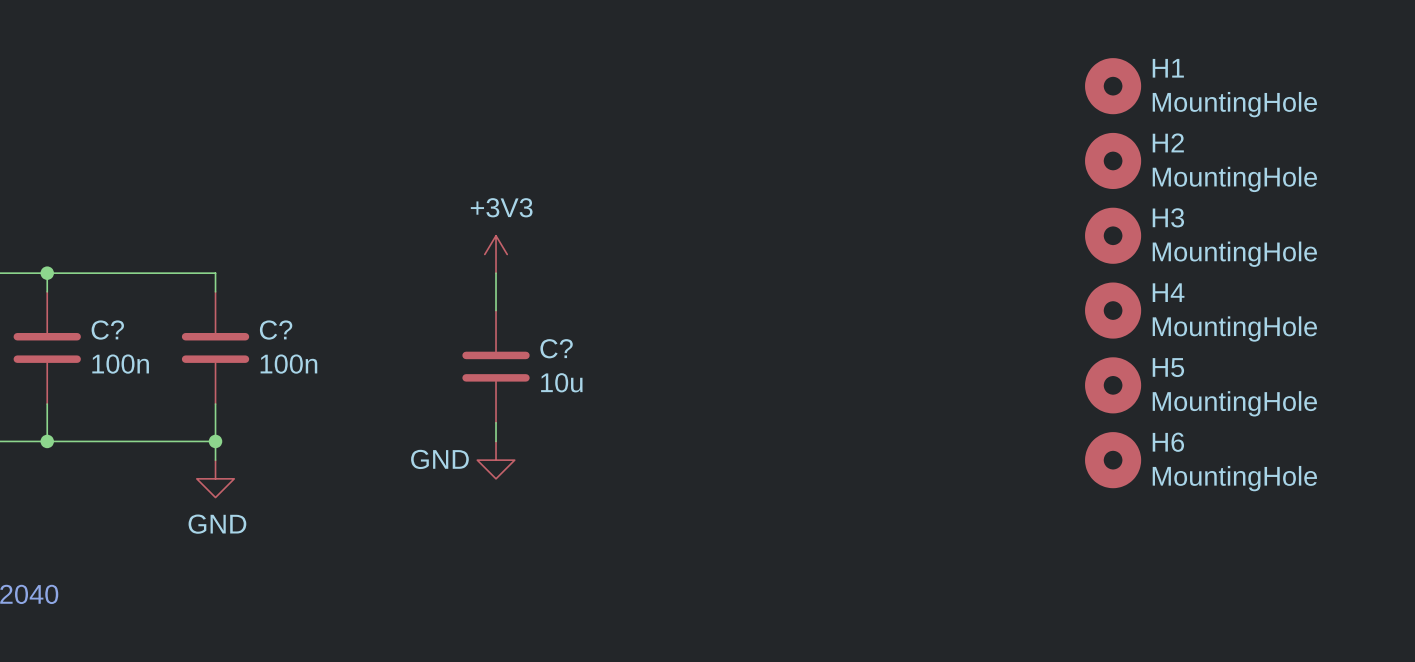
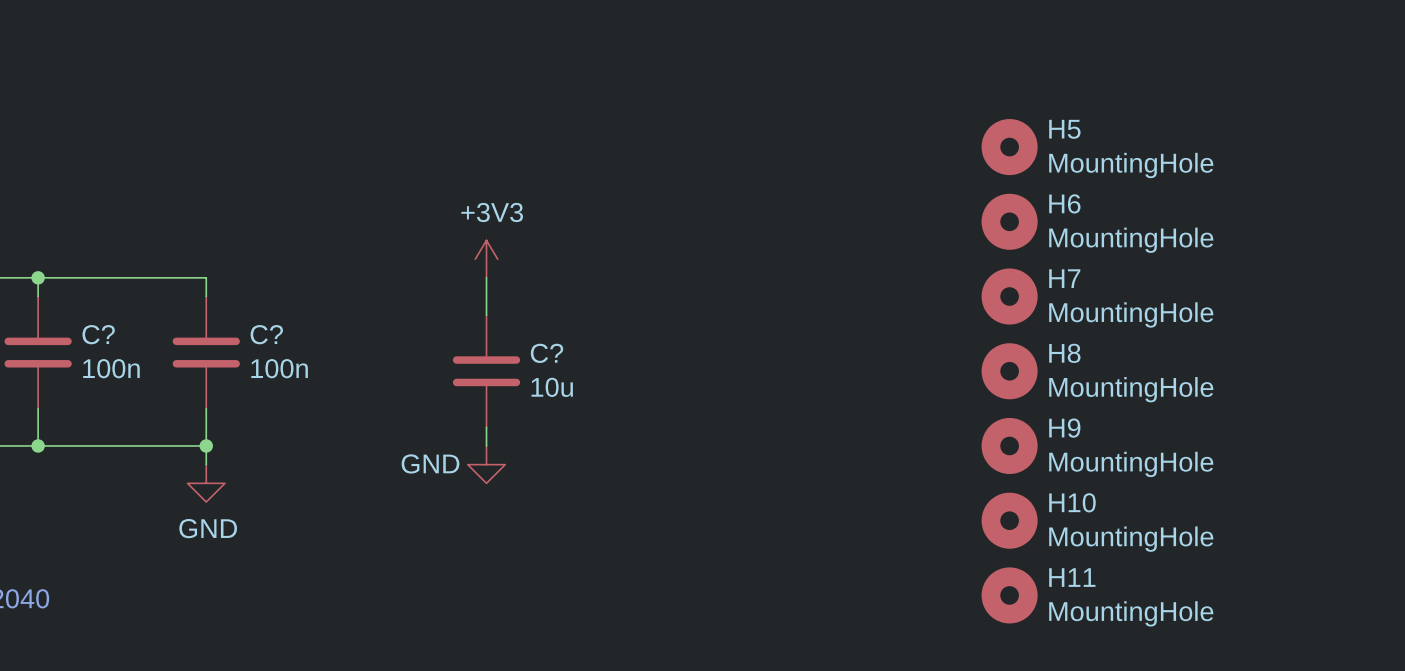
H1: MountingHole (1113, 86) -> none
H2: MountingHole (1113, 160) -> none
H3: MountingHole (1113, 235) -> none
H7: none -> MountingHole (1009, 296)
H4: MountingHole (1113, 310) -> none
H8: none -> MountingHole (1009, 371)
H5 position: (1113, 385) -> (1009, 147)
H9: none -> MountingHole (1009, 445)
H6 position: (1113, 460) -> (1009, 221)
H10: none -> MountingHole (1009, 520)
H11: none -> MountingHole (1009, 595)

